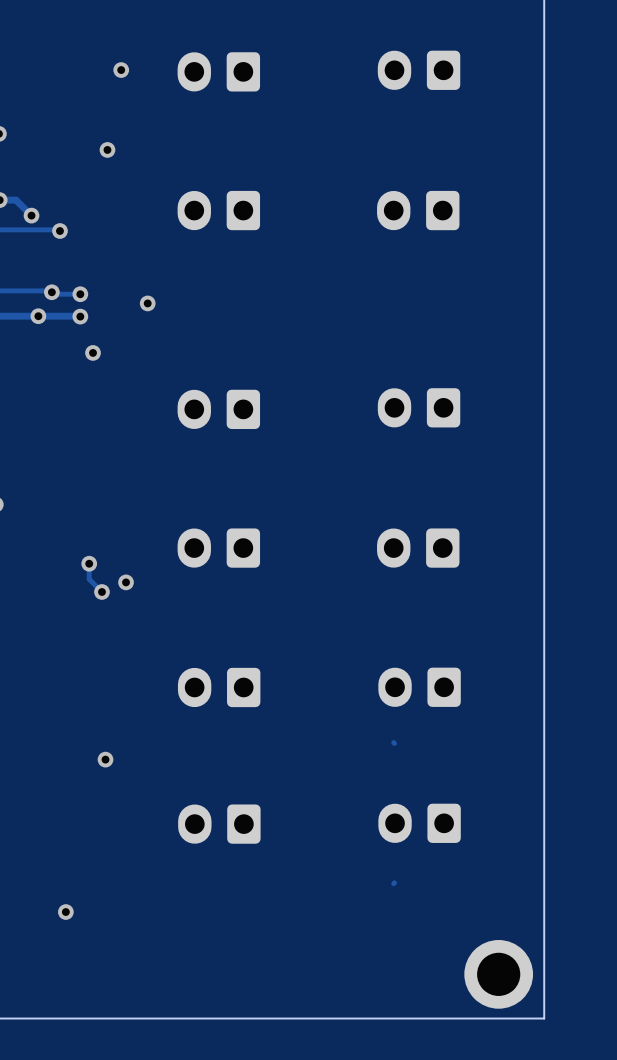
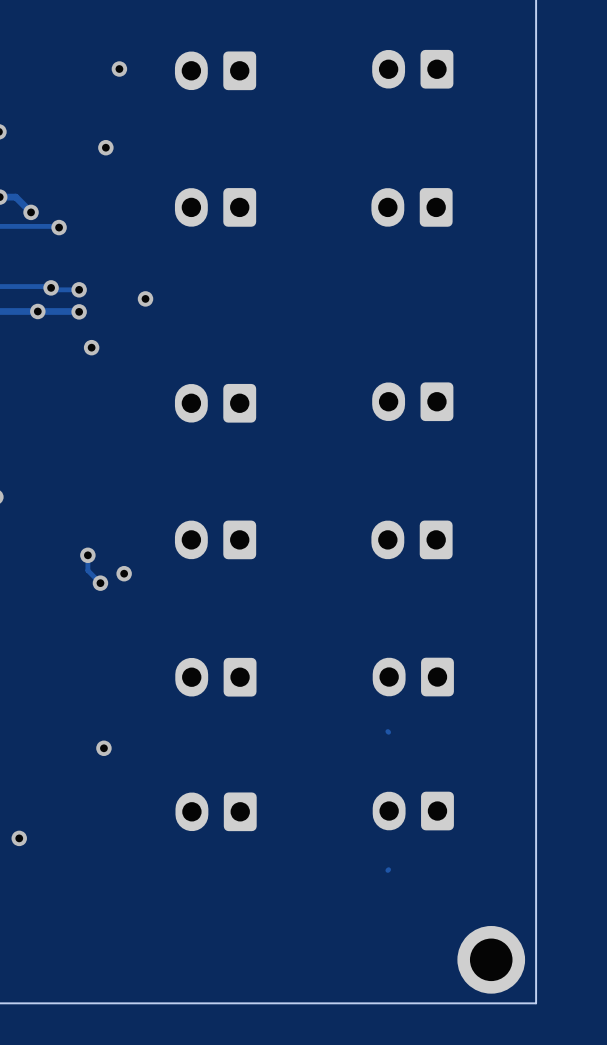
via position: (65, 912) -> (19, 838)

